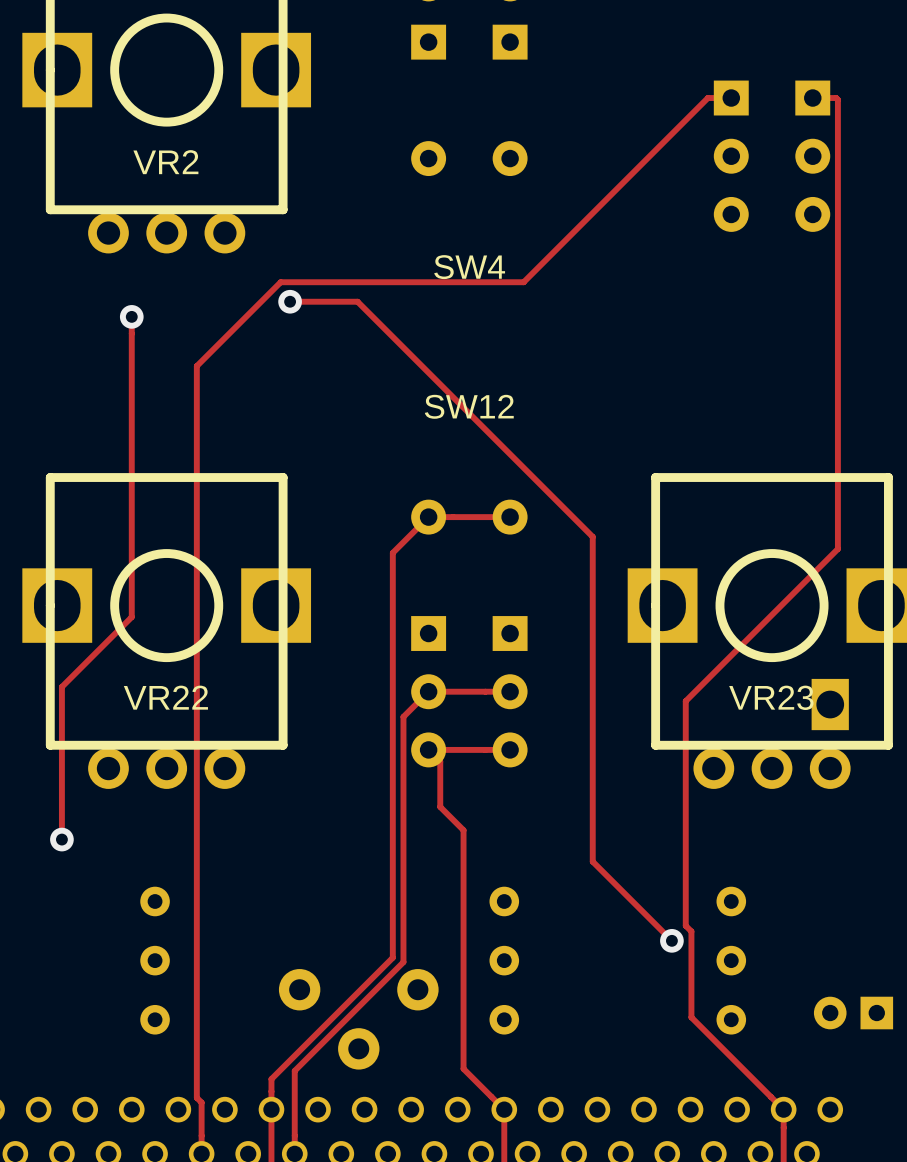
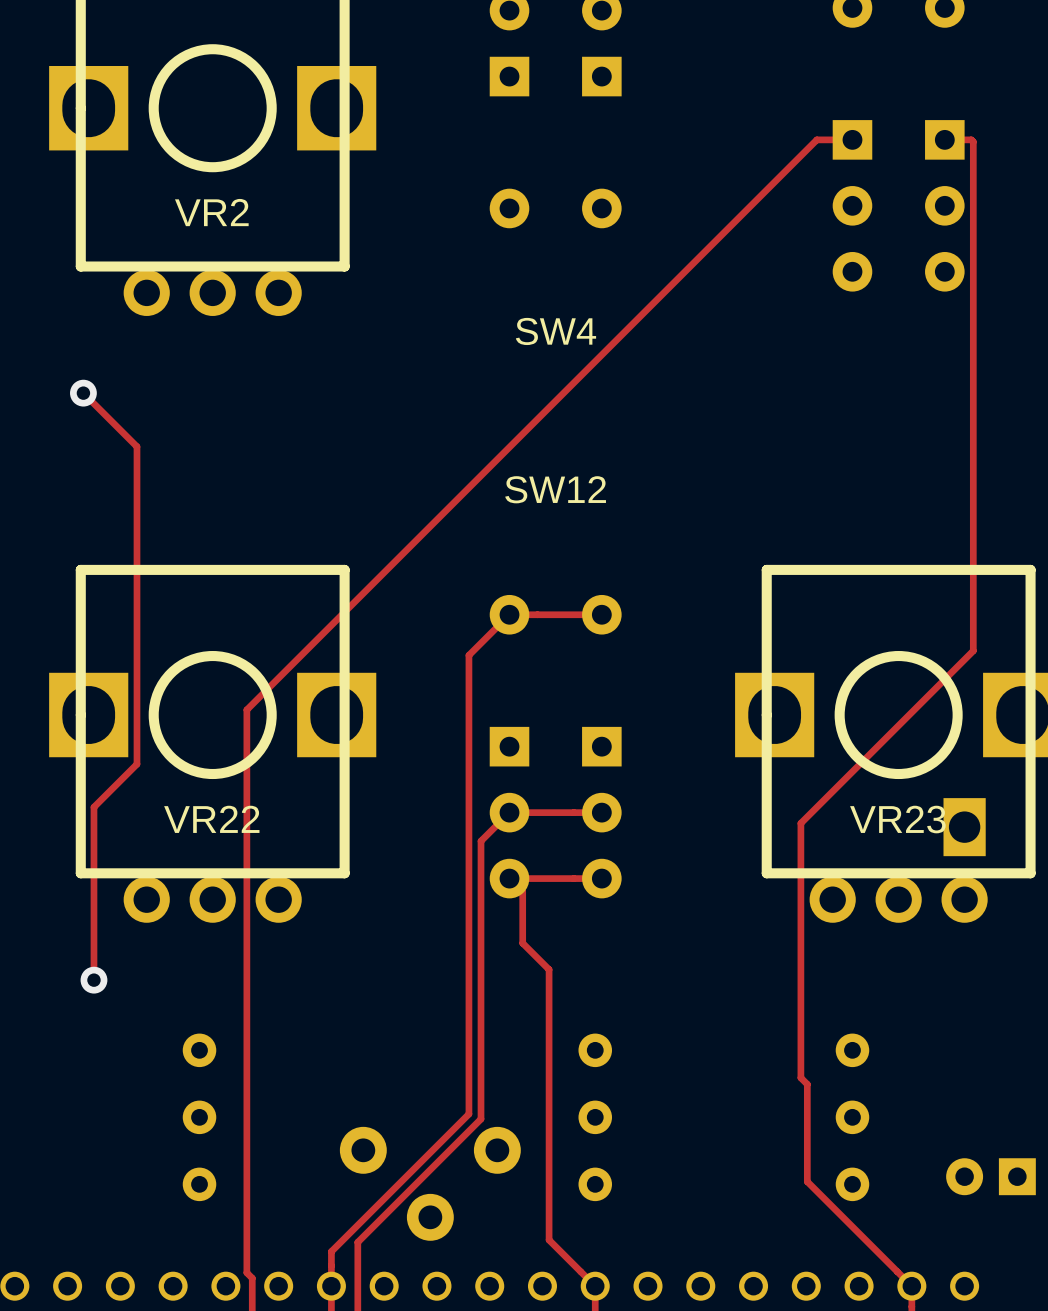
track: (707, 98) (523, 282) (280, 282) (196, 366) (196, 601) -> (825, 139) (816, 139) (246, 709)
track: (290, 301) (357, 301) (592, 536) (592, 861) (671, 940) -> none
via: (290, 301) -> none
track: (131, 316) (131, 617) (99, 648) -> (83, 393) (136, 446) (136, 764)
via position: (131, 316) -> (83, 393)
via: (671, 940) -> none

